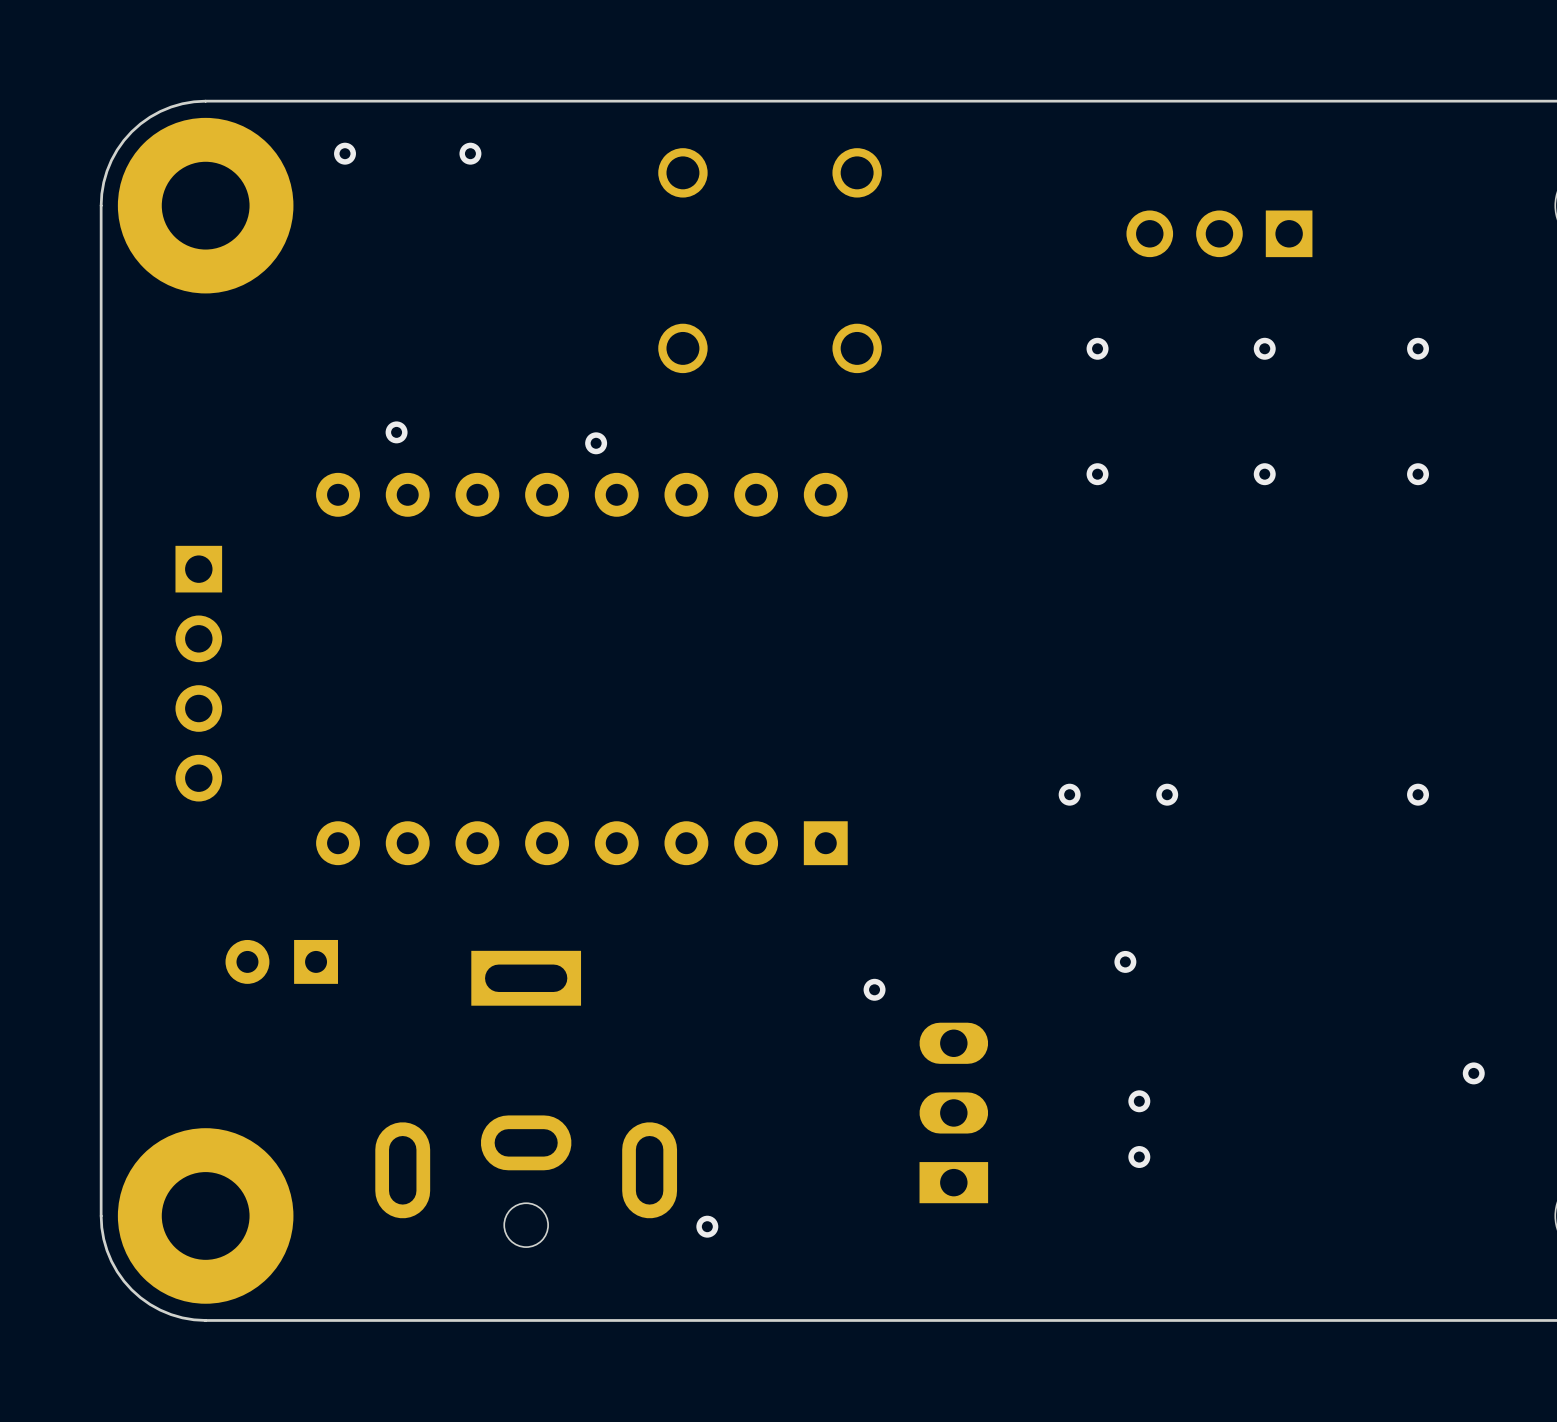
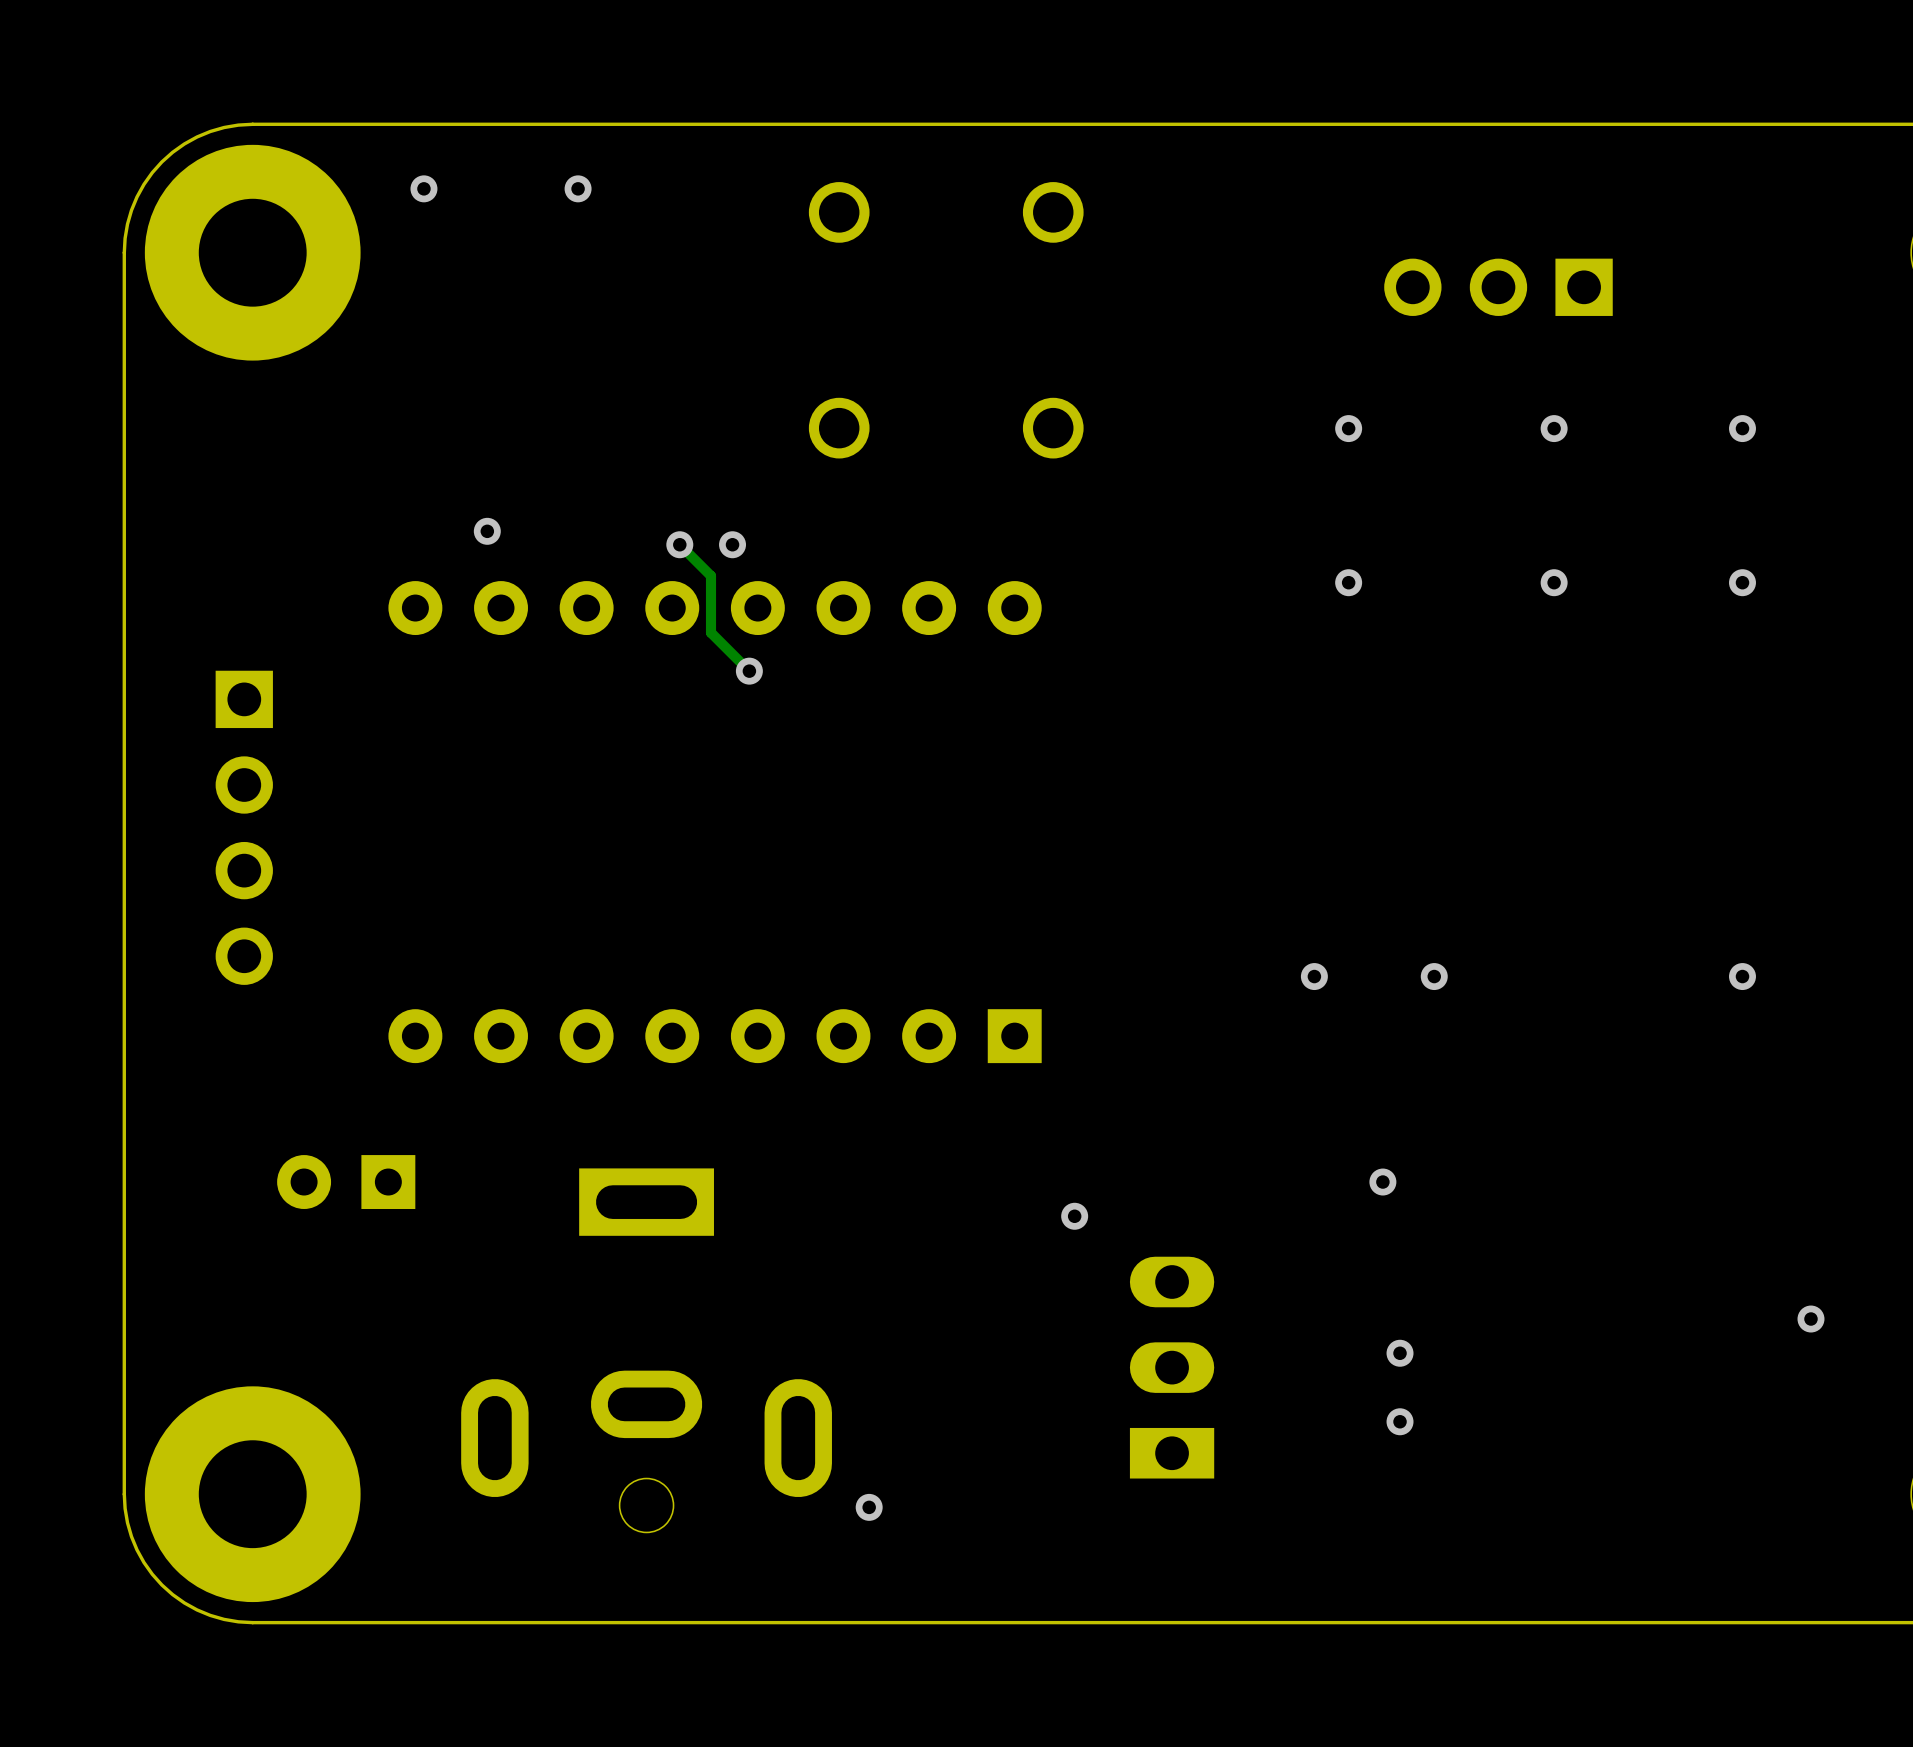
track: none -> (679, 544) (711, 575) (711, 632) (749, 671)
via: none -> (679, 544)
via: none -> (749, 671)

